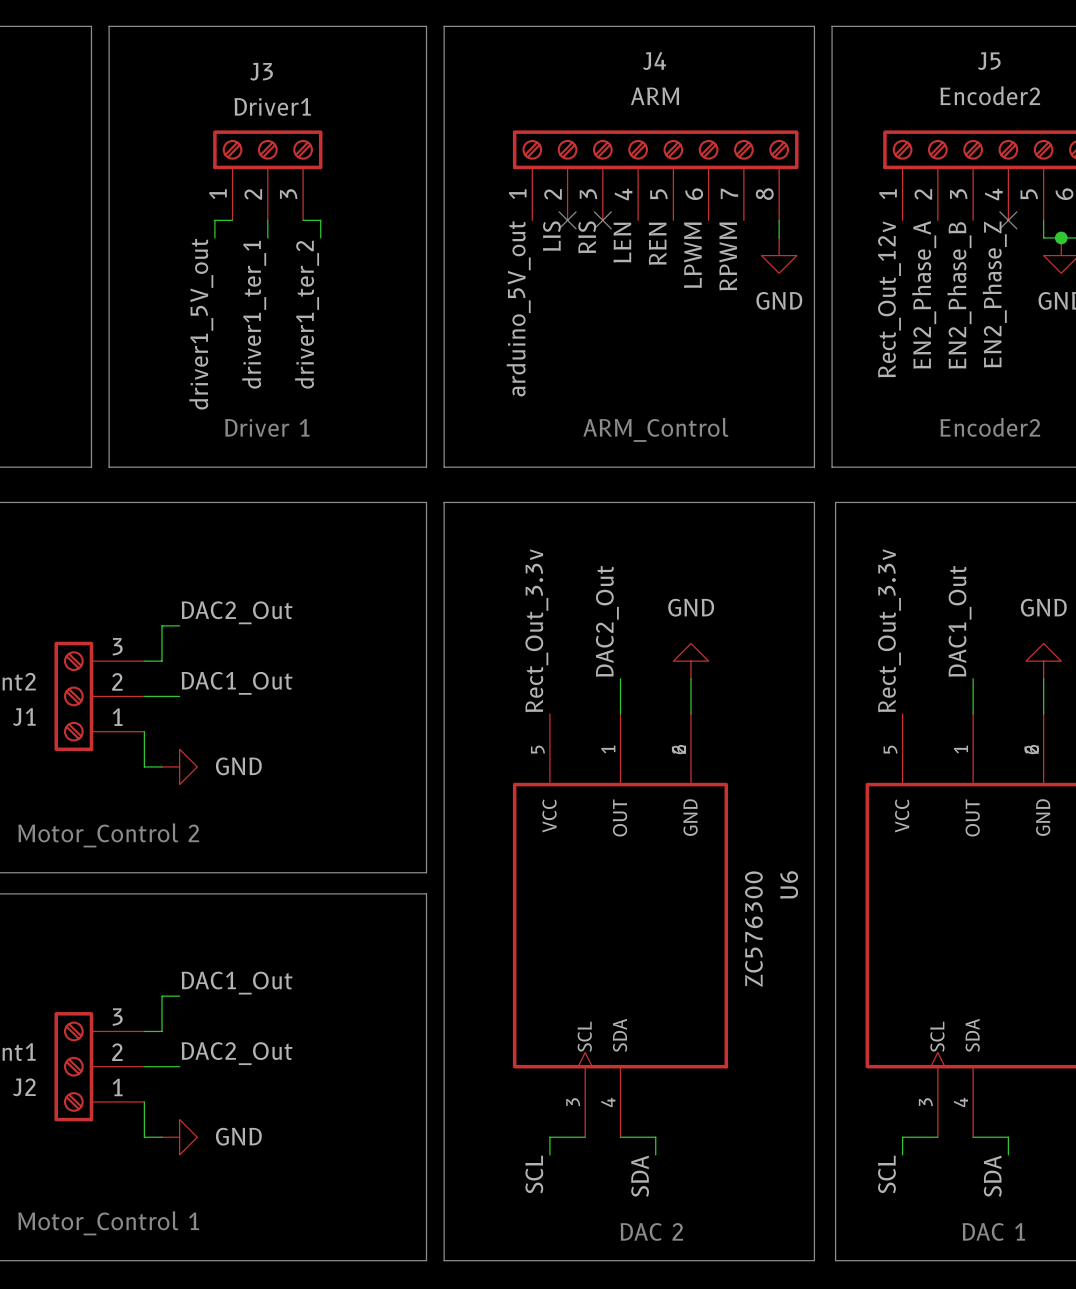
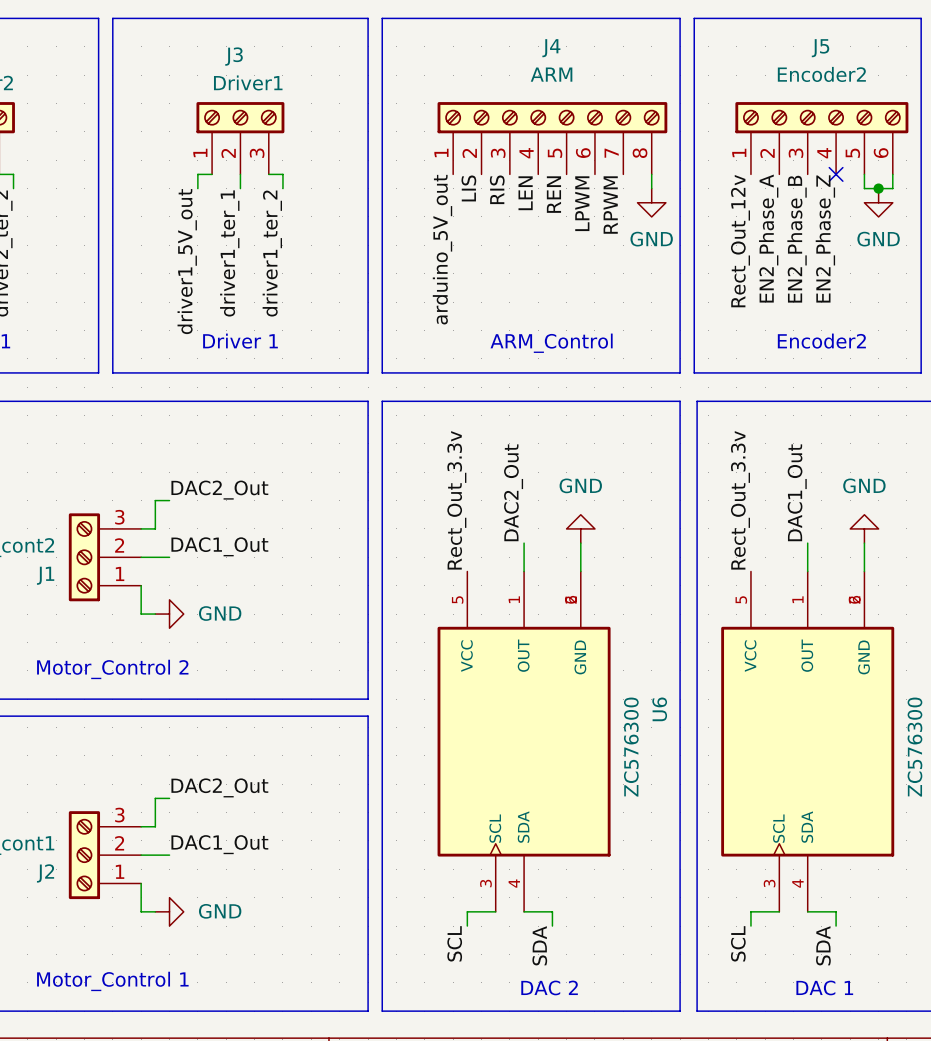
no-connect mark: (567, 220) -> none
no-connect mark: (602, 220) -> none
label: DAC1_Out (237, 983) -> DAC2_Out (219, 787)
label: DAC2_Out (237, 1053) -> DAC1_Out (219, 844)

